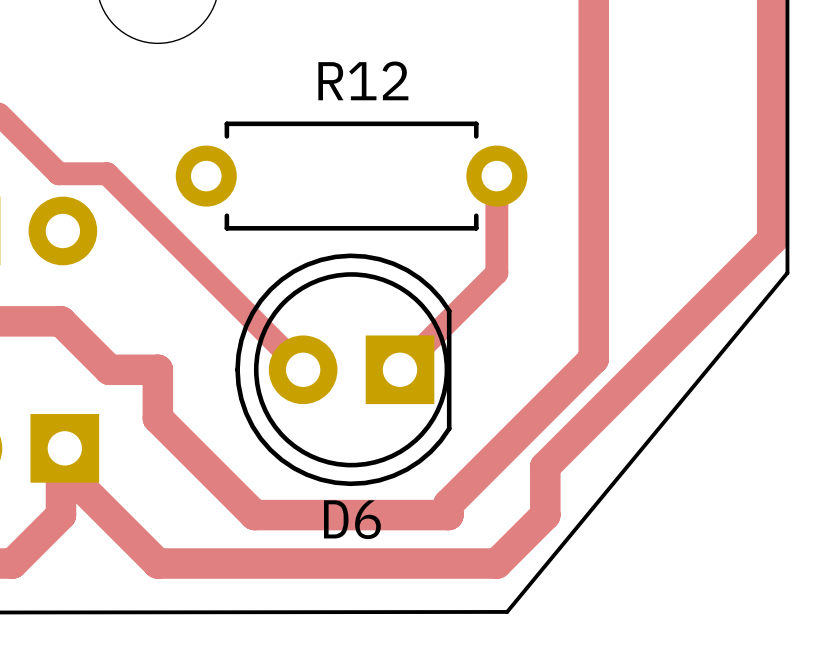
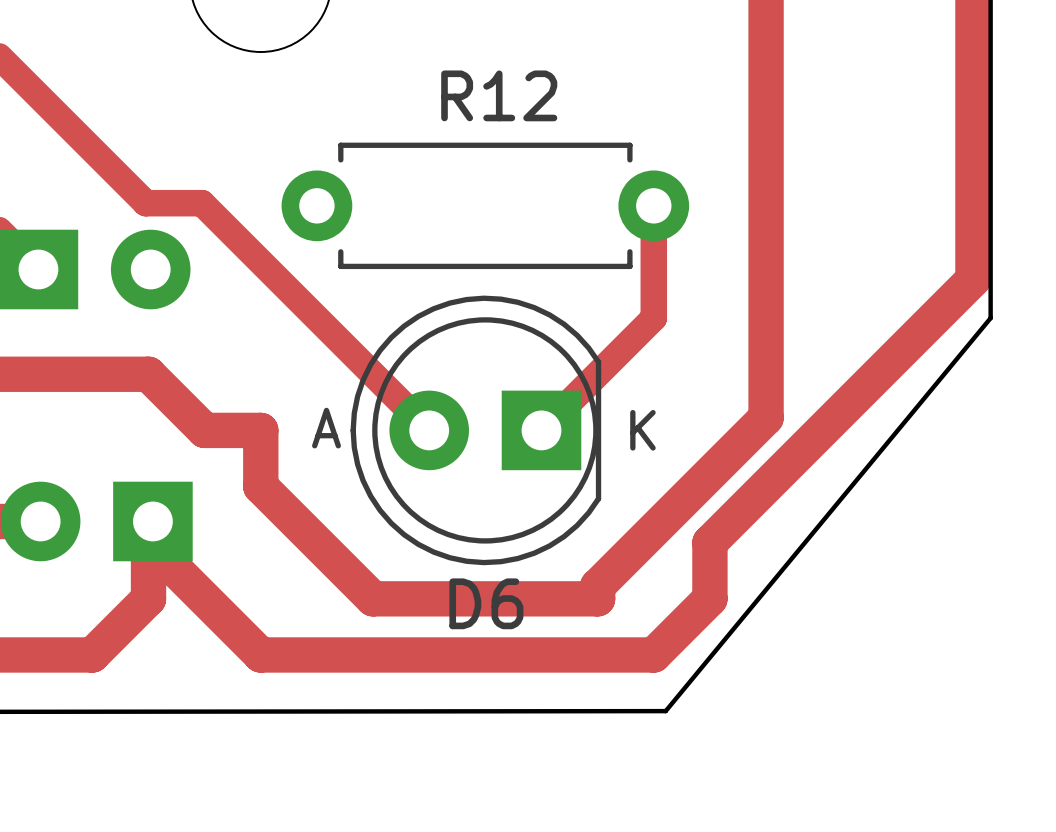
text: none -> A (326, 428)
text: none -> K (642, 430)

